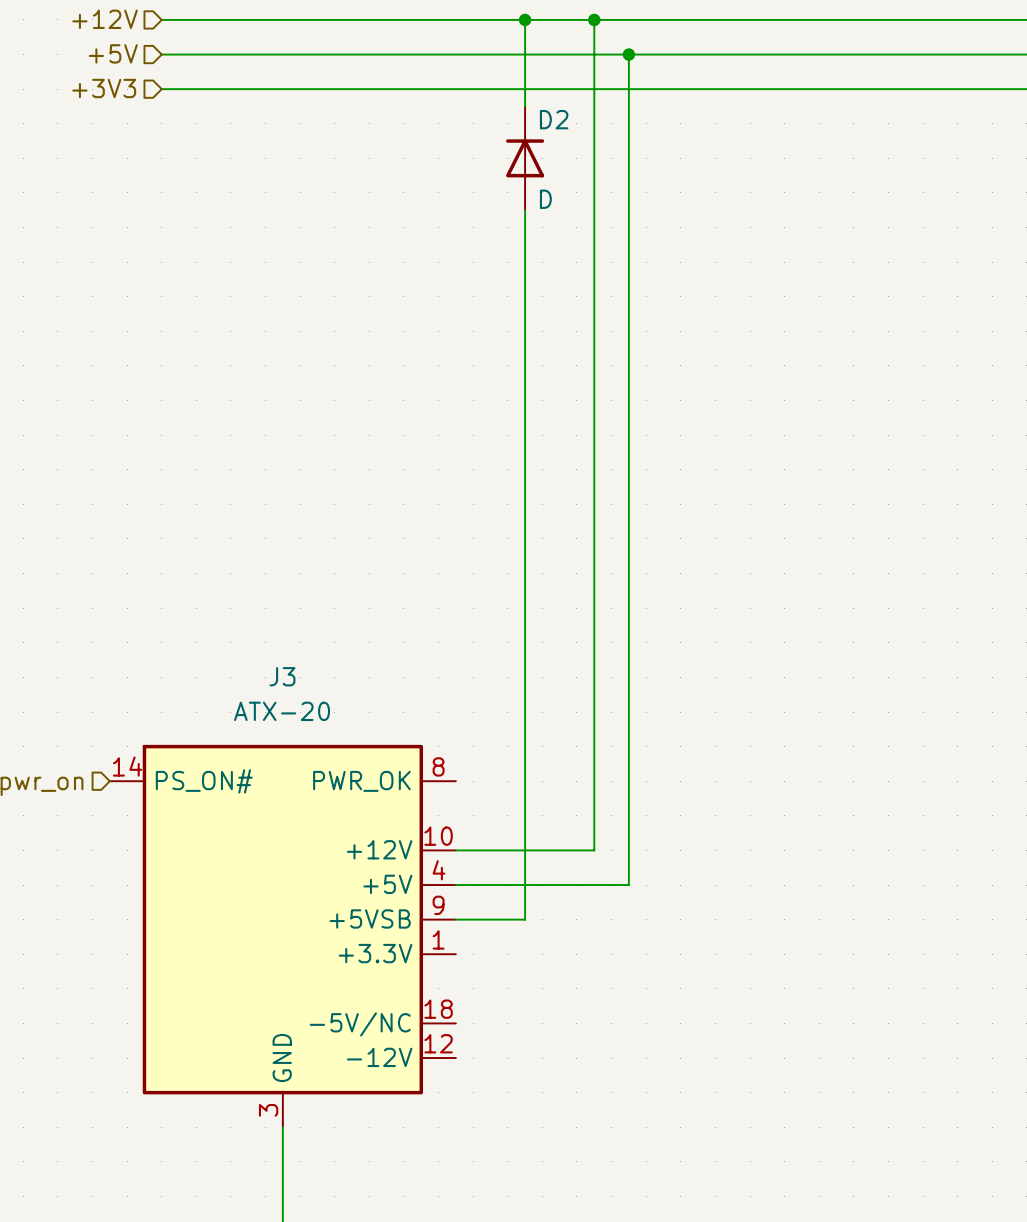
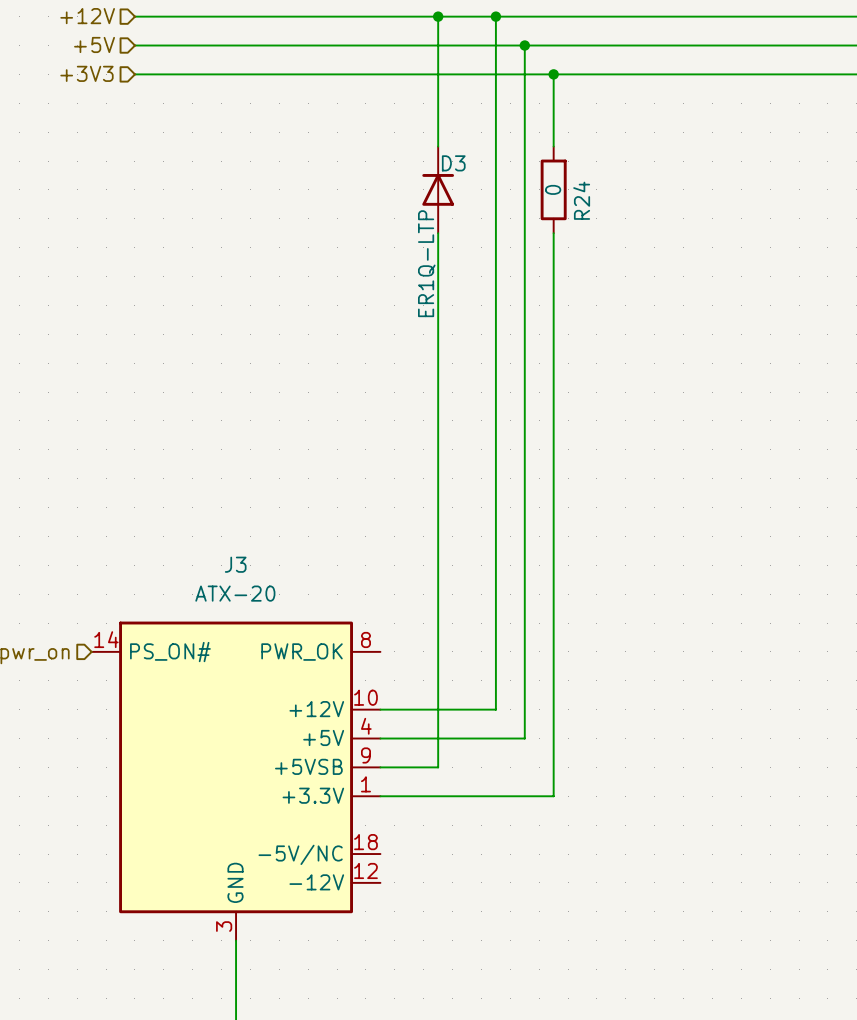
wire: none -> (553, 74) (553, 146)
junction: none -> (553, 74)
D2: D (525, 158) -> none
D3: none -> ER1Q-LTP (438, 189)
R24: none -> 0 (553, 189)
wire: none -> (553, 233) (553, 796) (380, 796)

